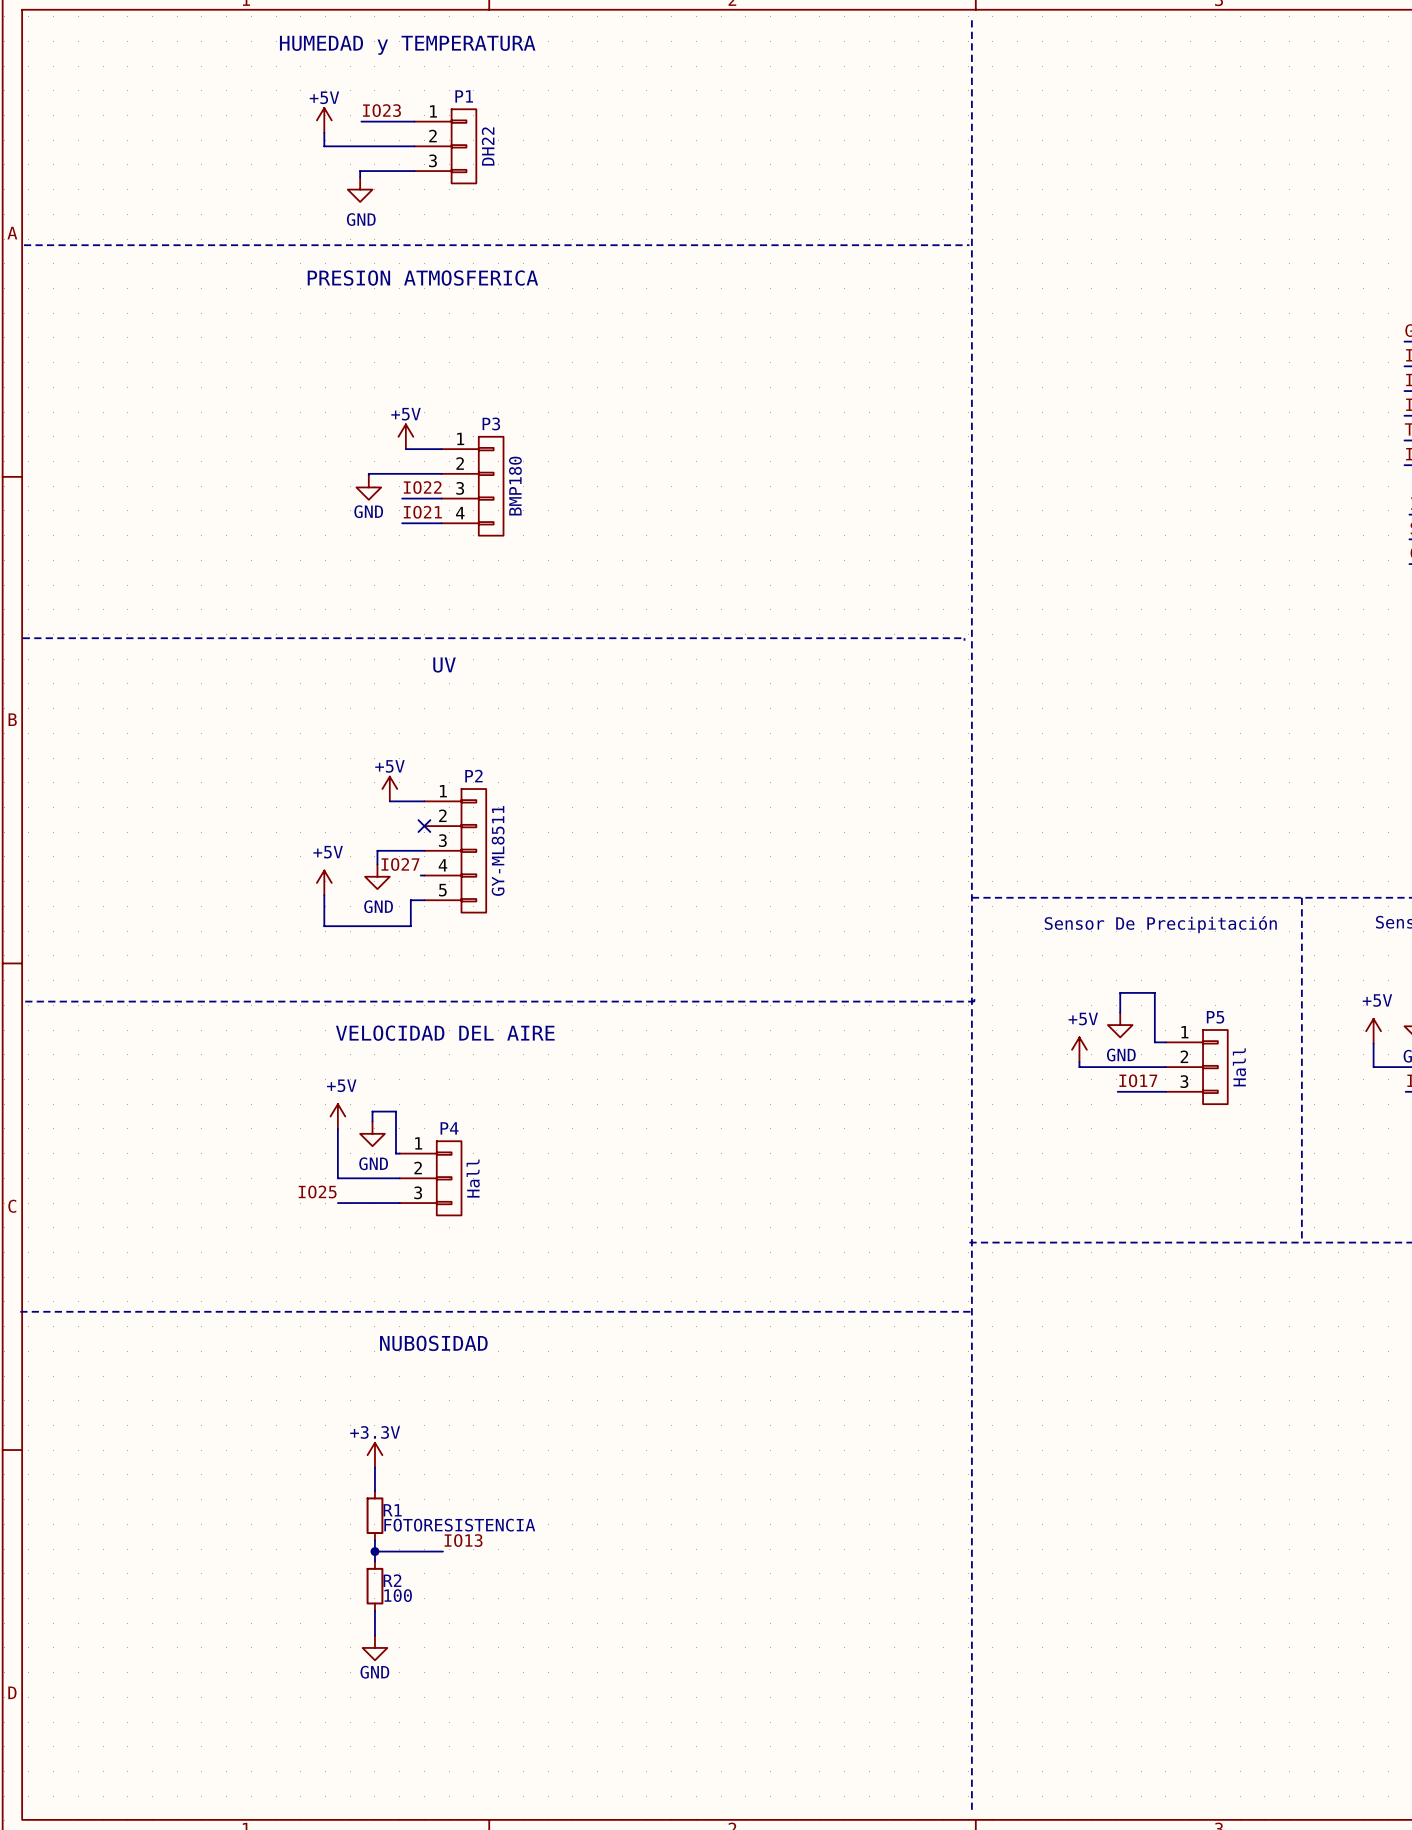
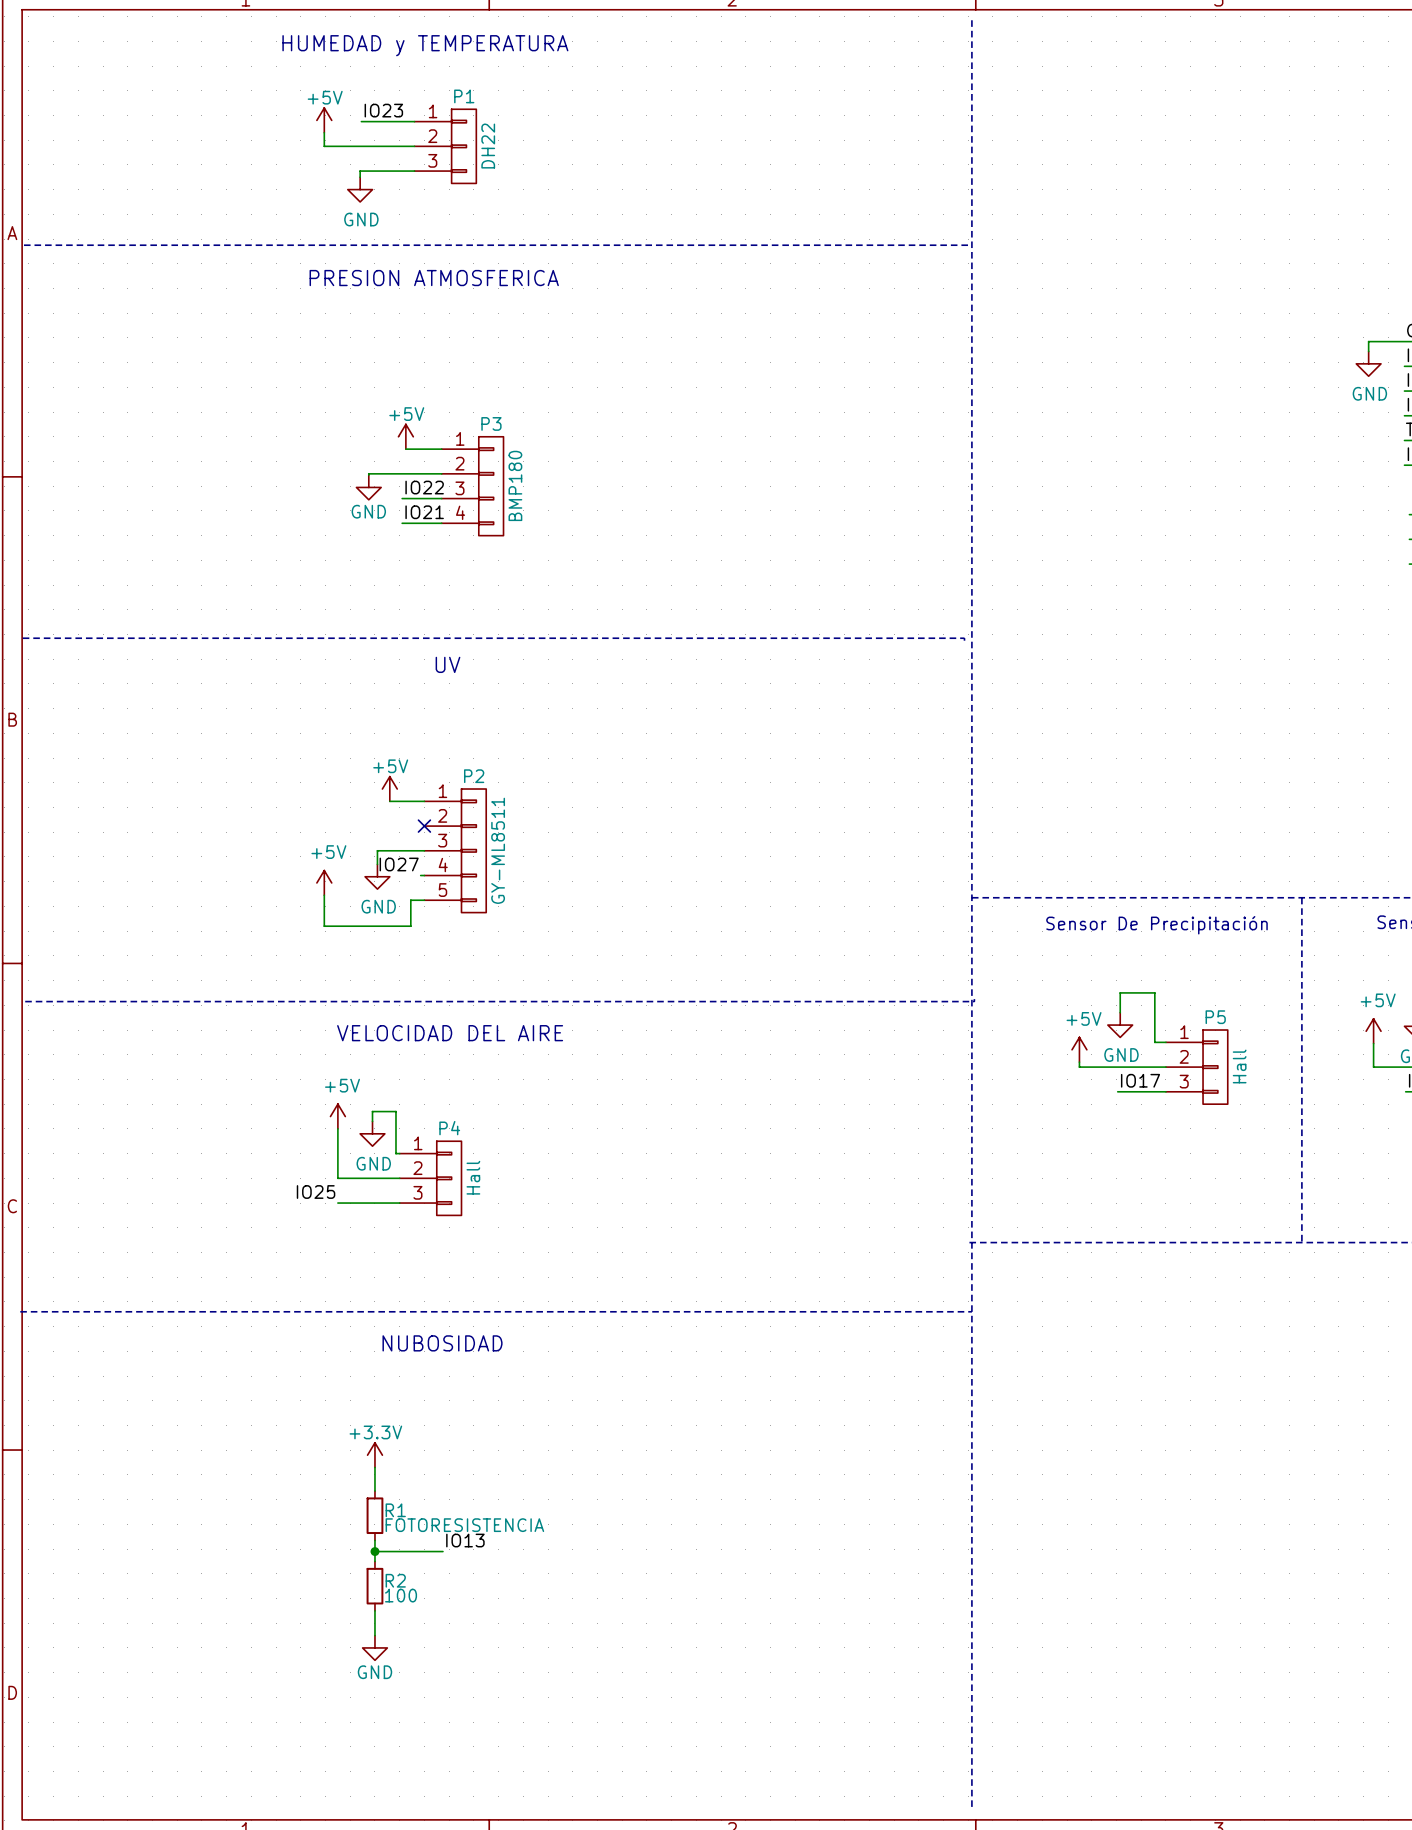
wire: none -> (1404, 341) (1368, 341) (1368, 351)
power symbol: none -> GND (1368, 363)

